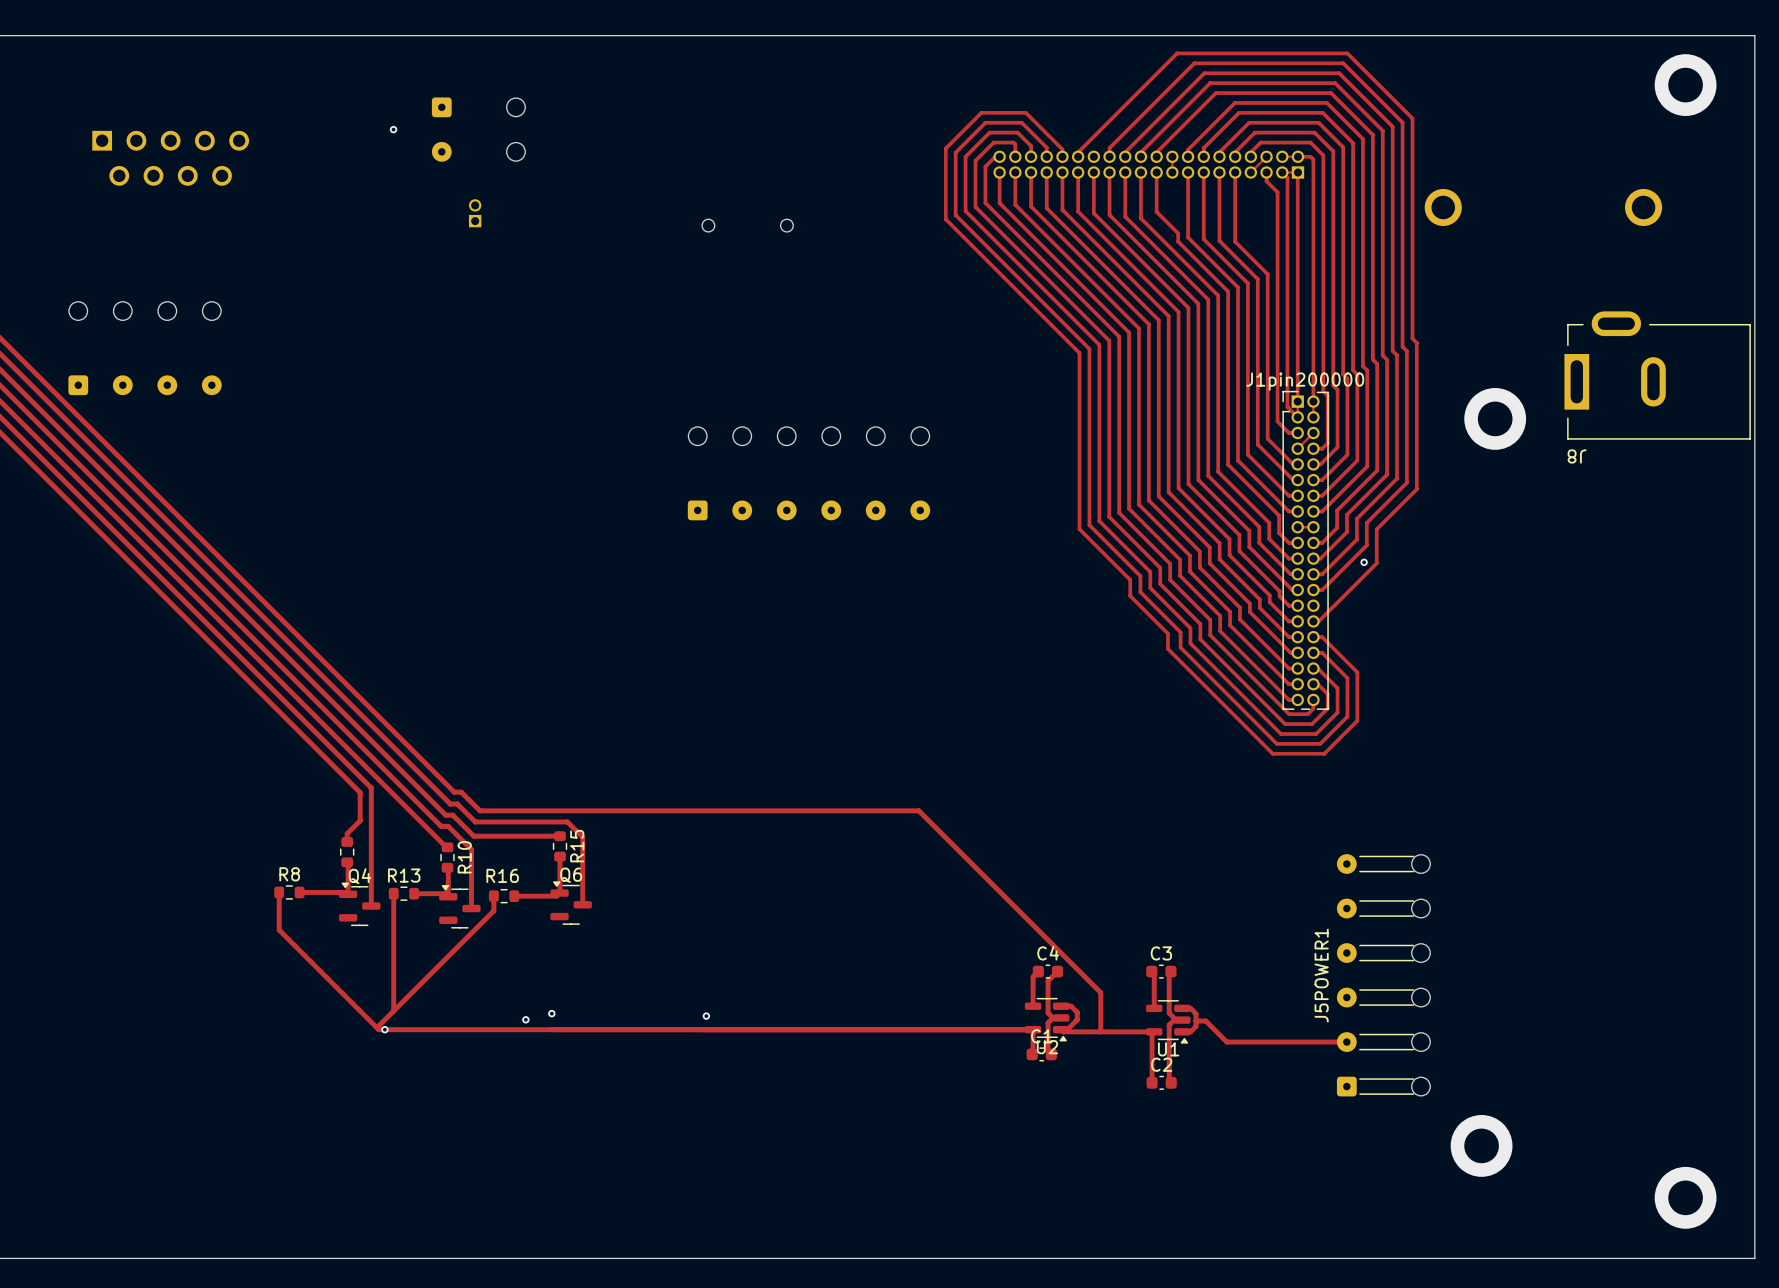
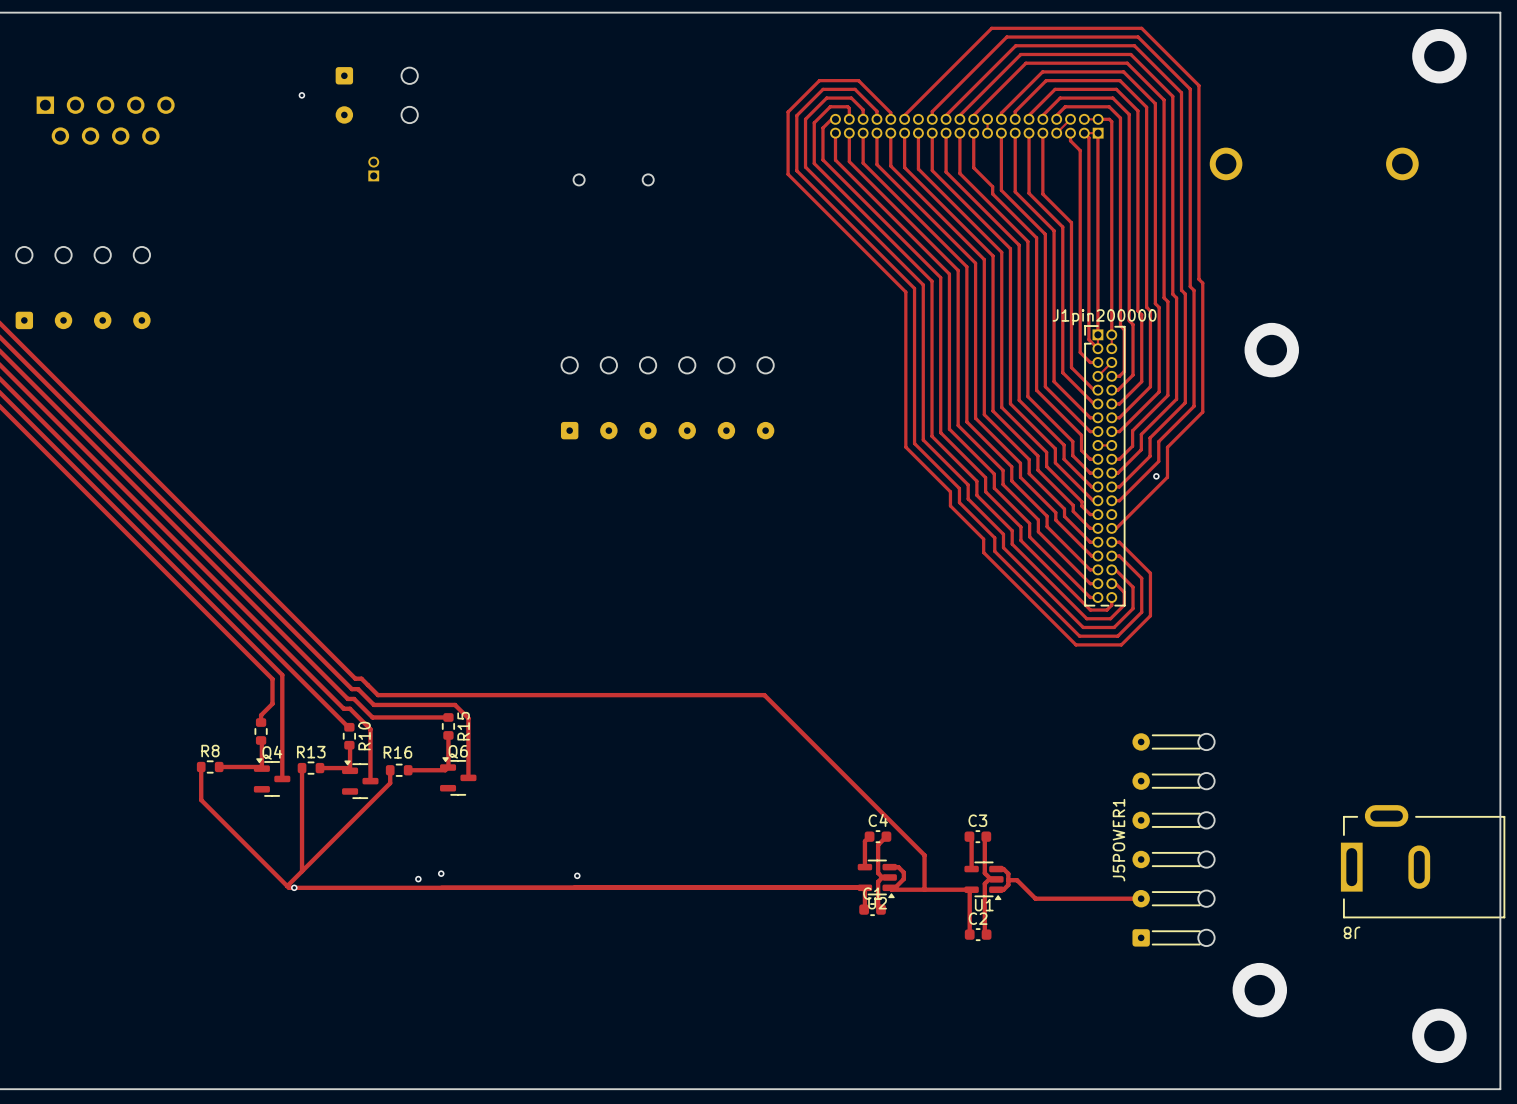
J8 position: (1657, 375) -> (1422, 861)

